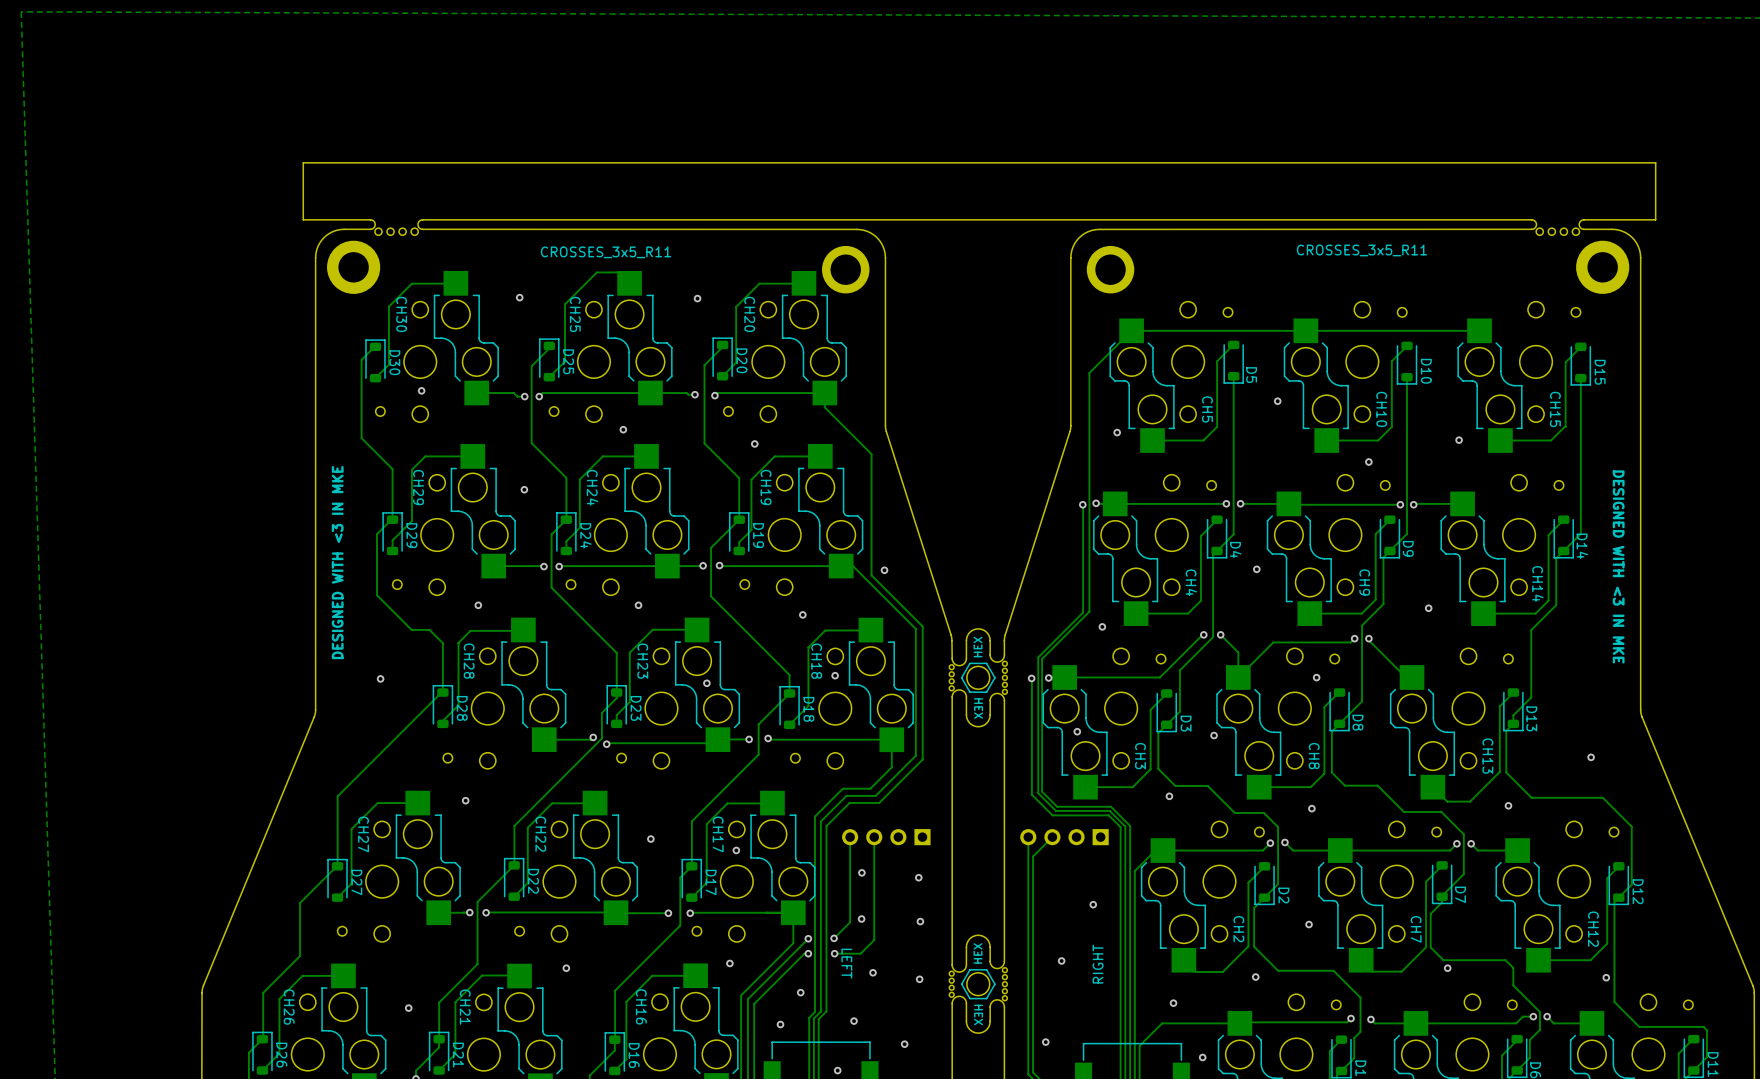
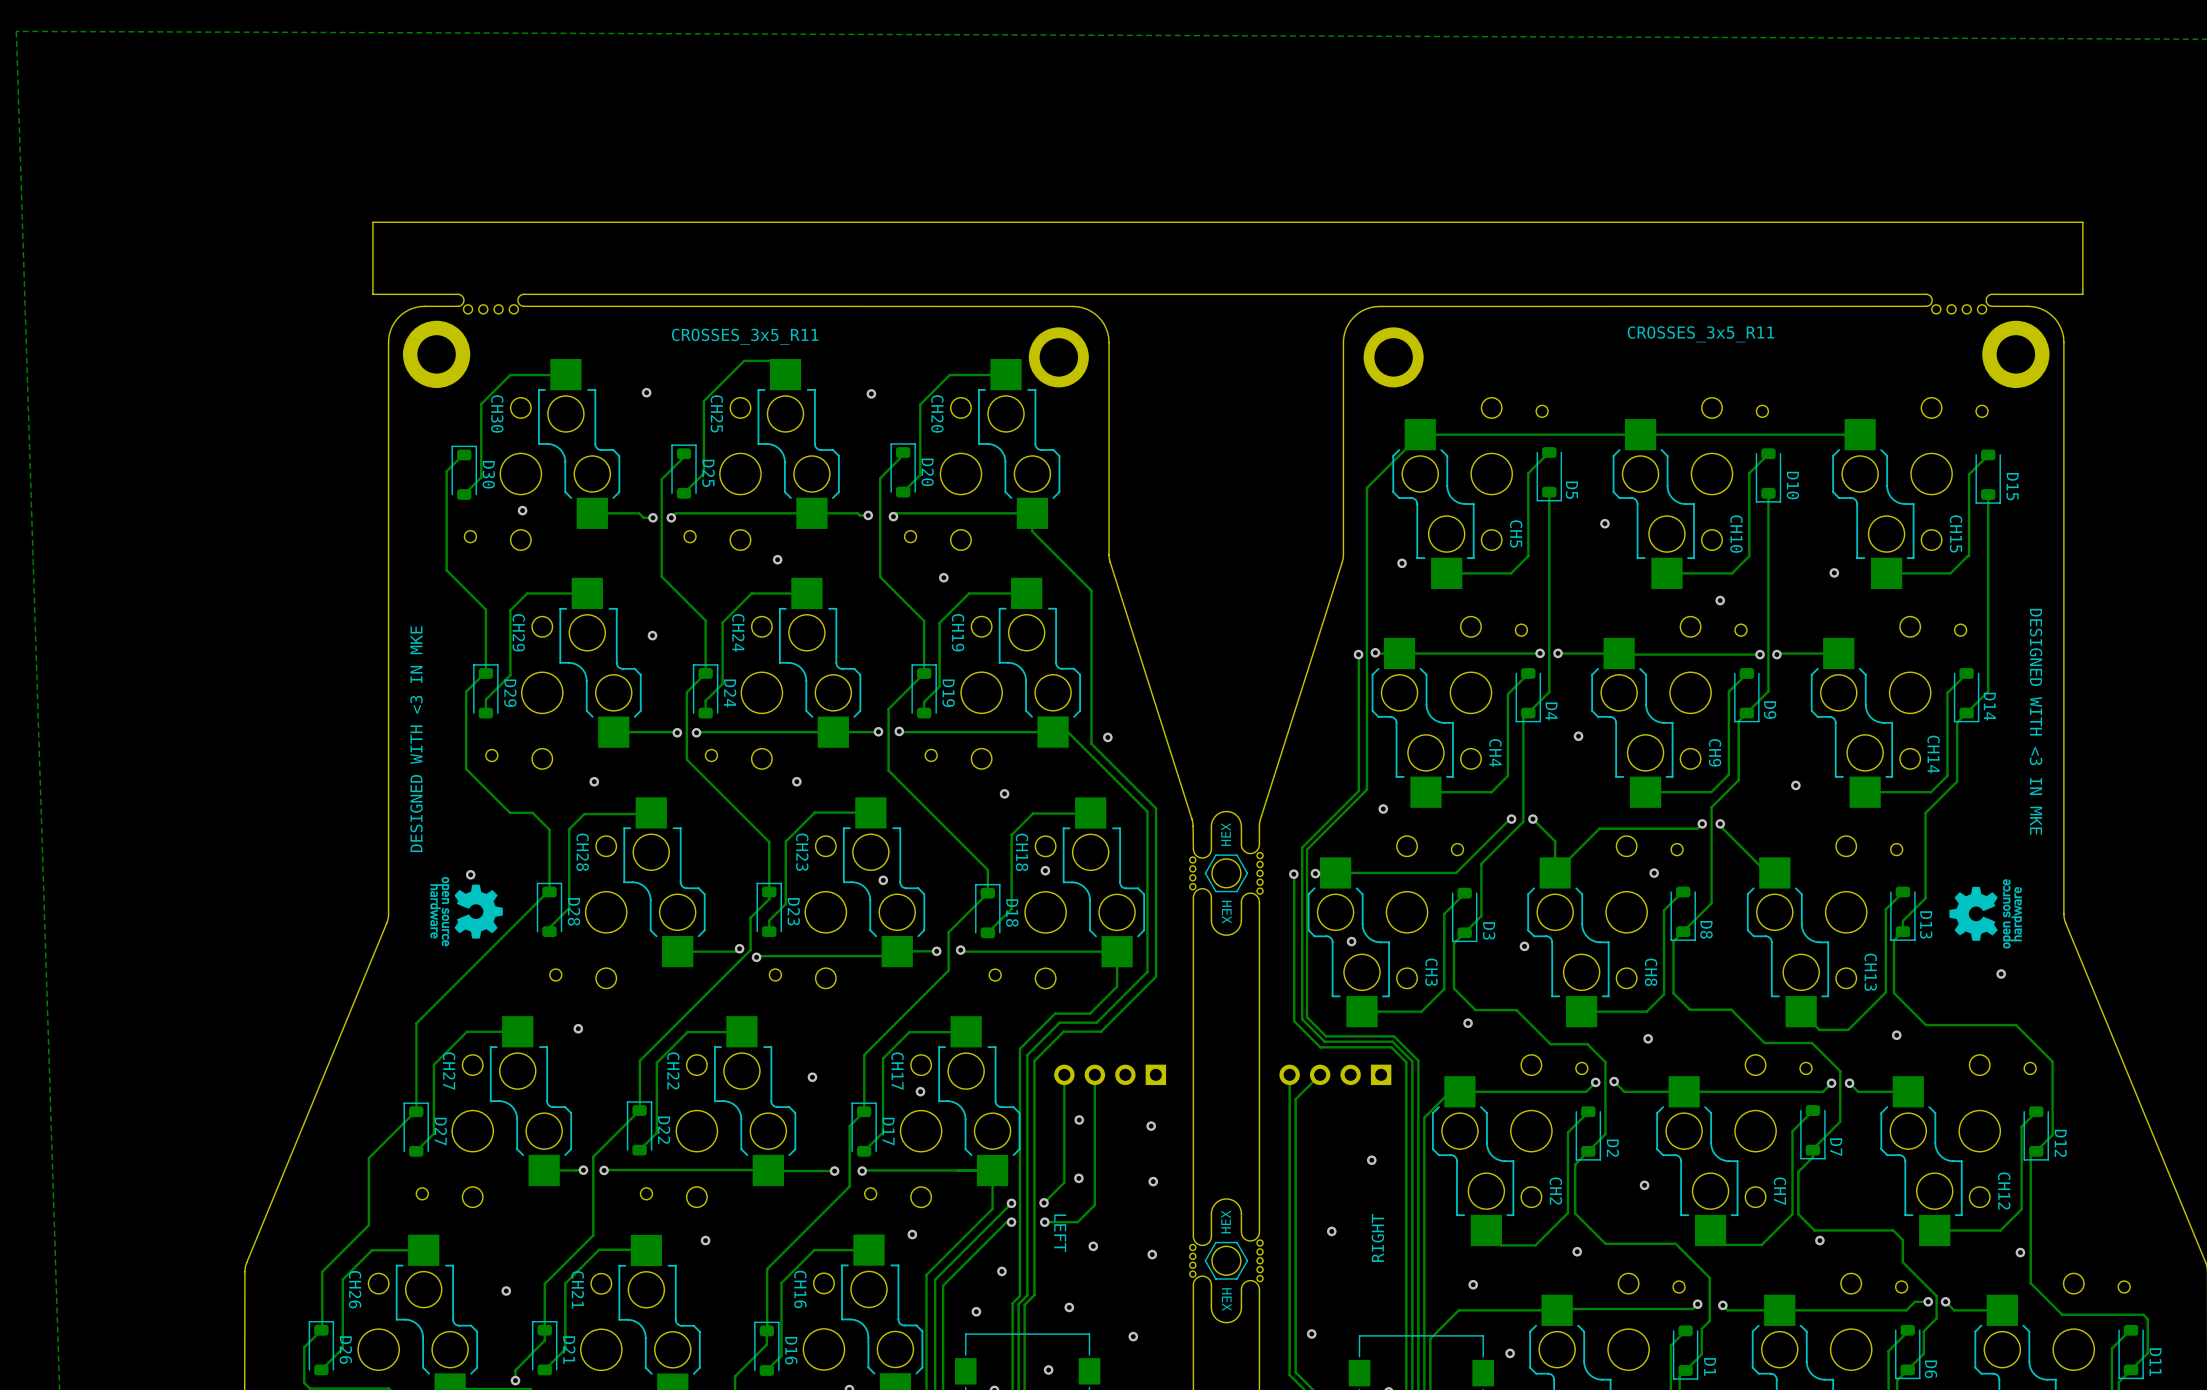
drawing: none -> [430, 877, 503, 947]
drawing: none -> [1949, 879, 2022, 949]

